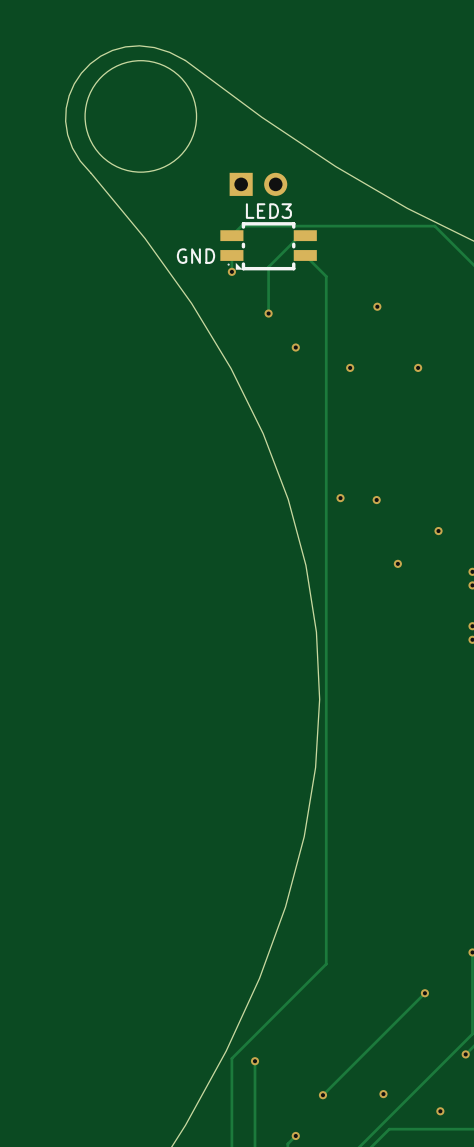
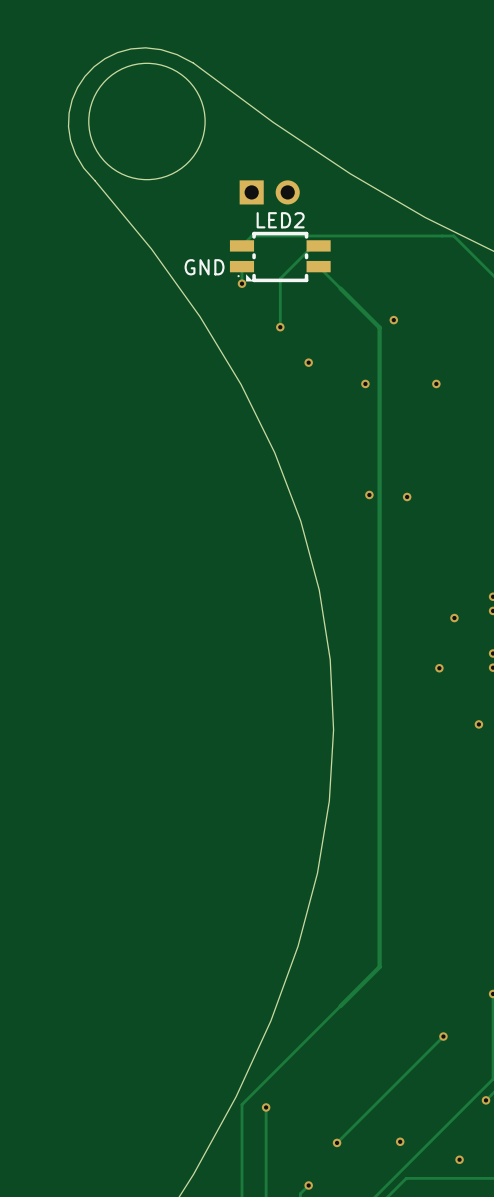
LED3 name: LED3 (268, 211) -> LED2 (280, 220)
track: (326, 276) (326, 964) -> (340, 288) (379, 327) (379, 967) (340, 1006)
via: none -> (369, 494)
via: none -> (407, 497)
via: (340, 498) -> none
via: (376, 500) -> none
via: (438, 531) -> none
via: (397, 563) -> none
via: none -> (454, 618)
via: none -> (439, 668)
via: none -> (478, 724)

